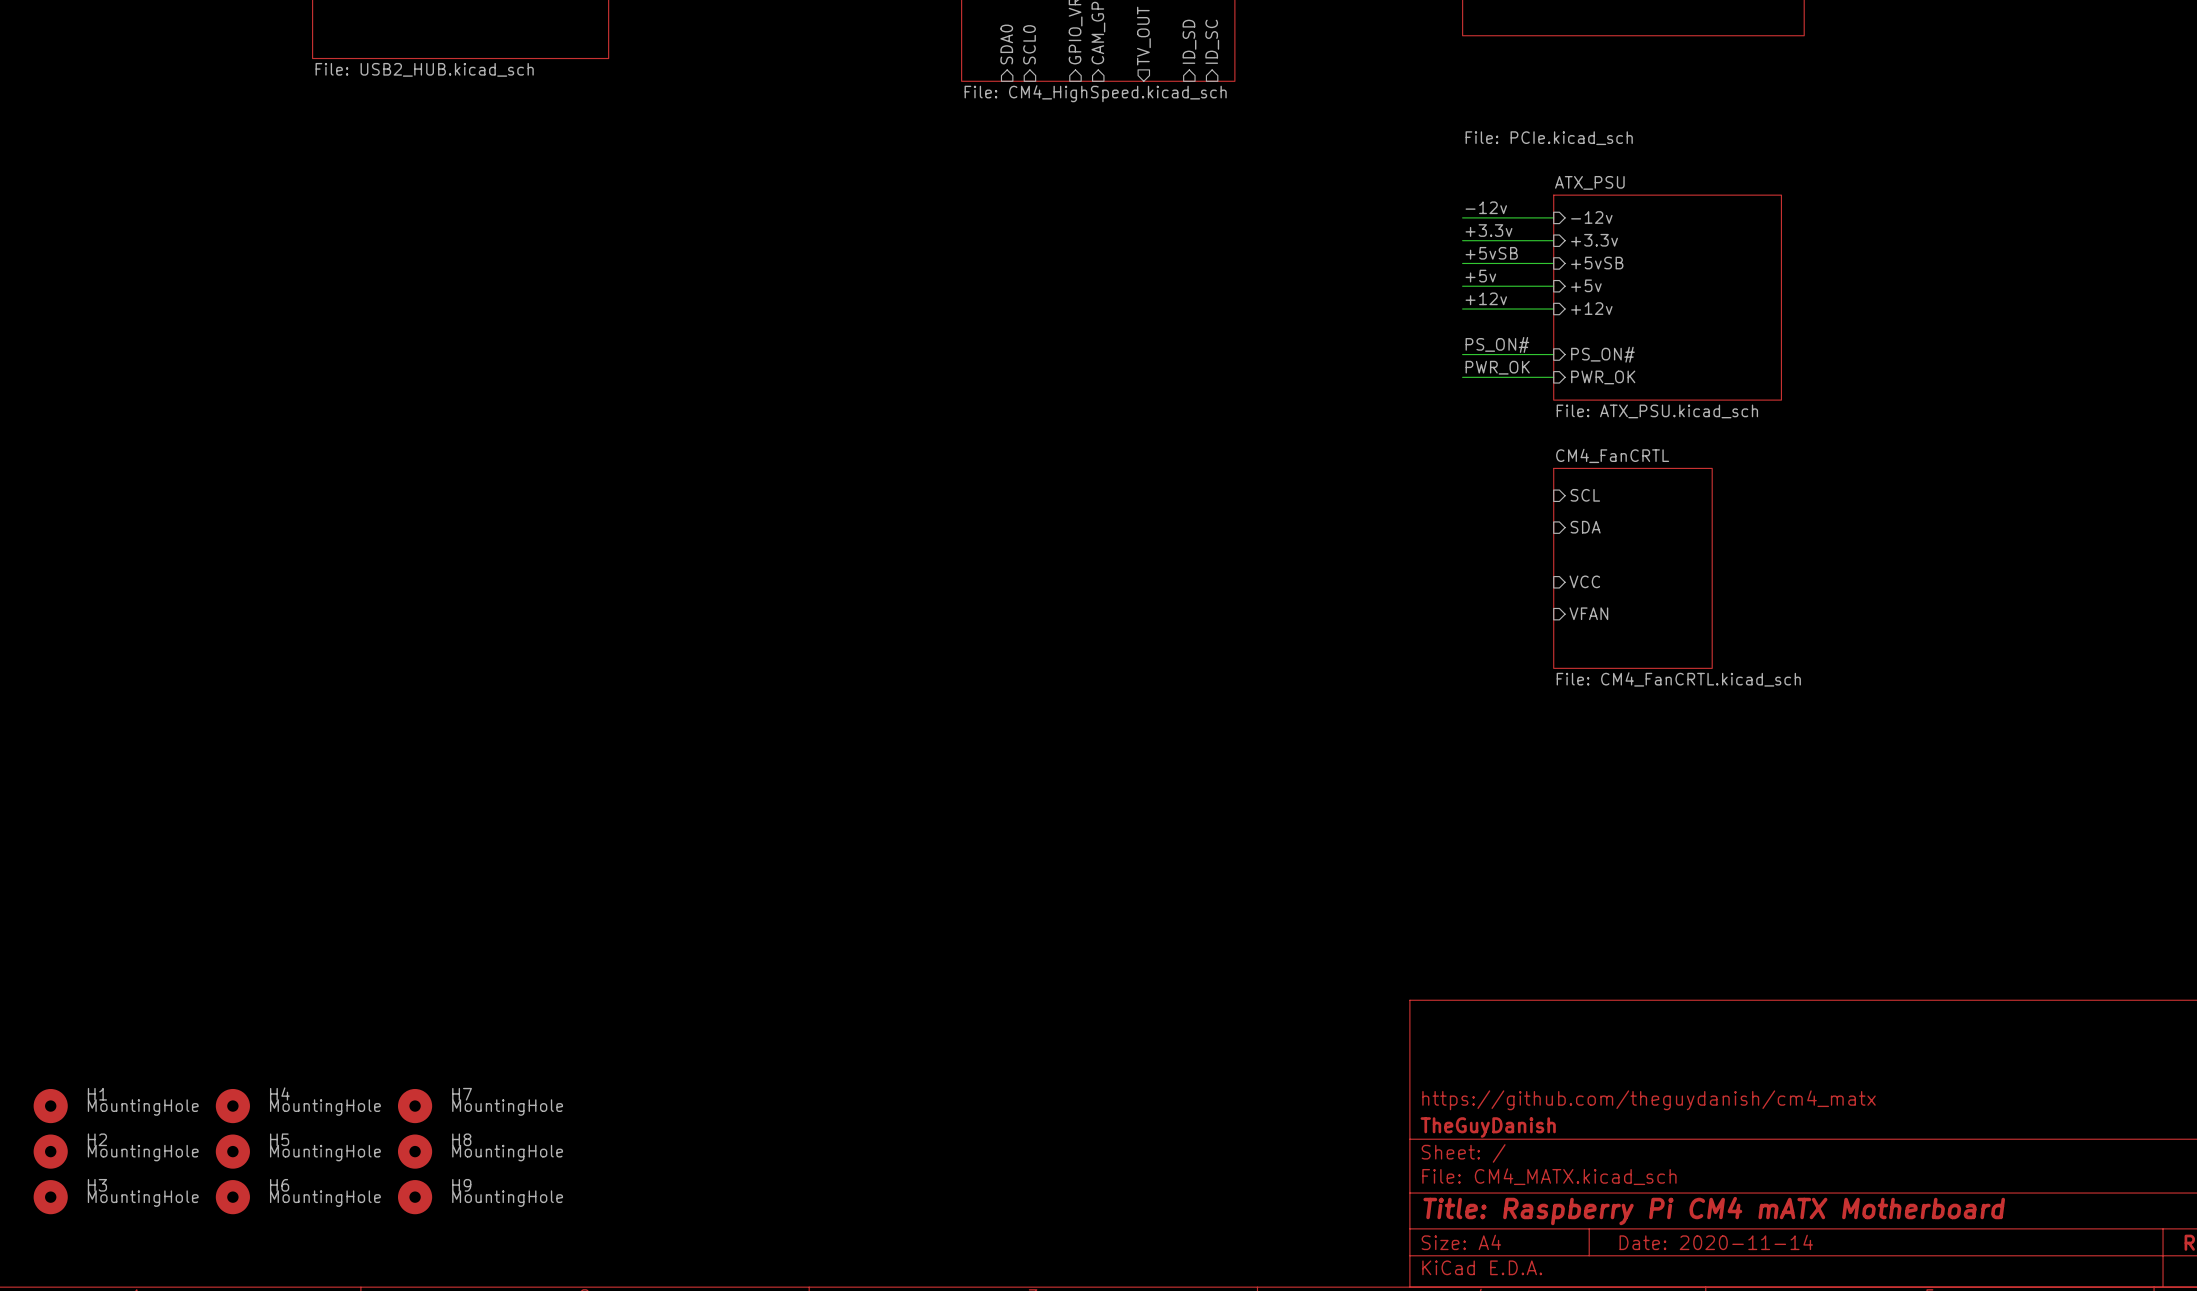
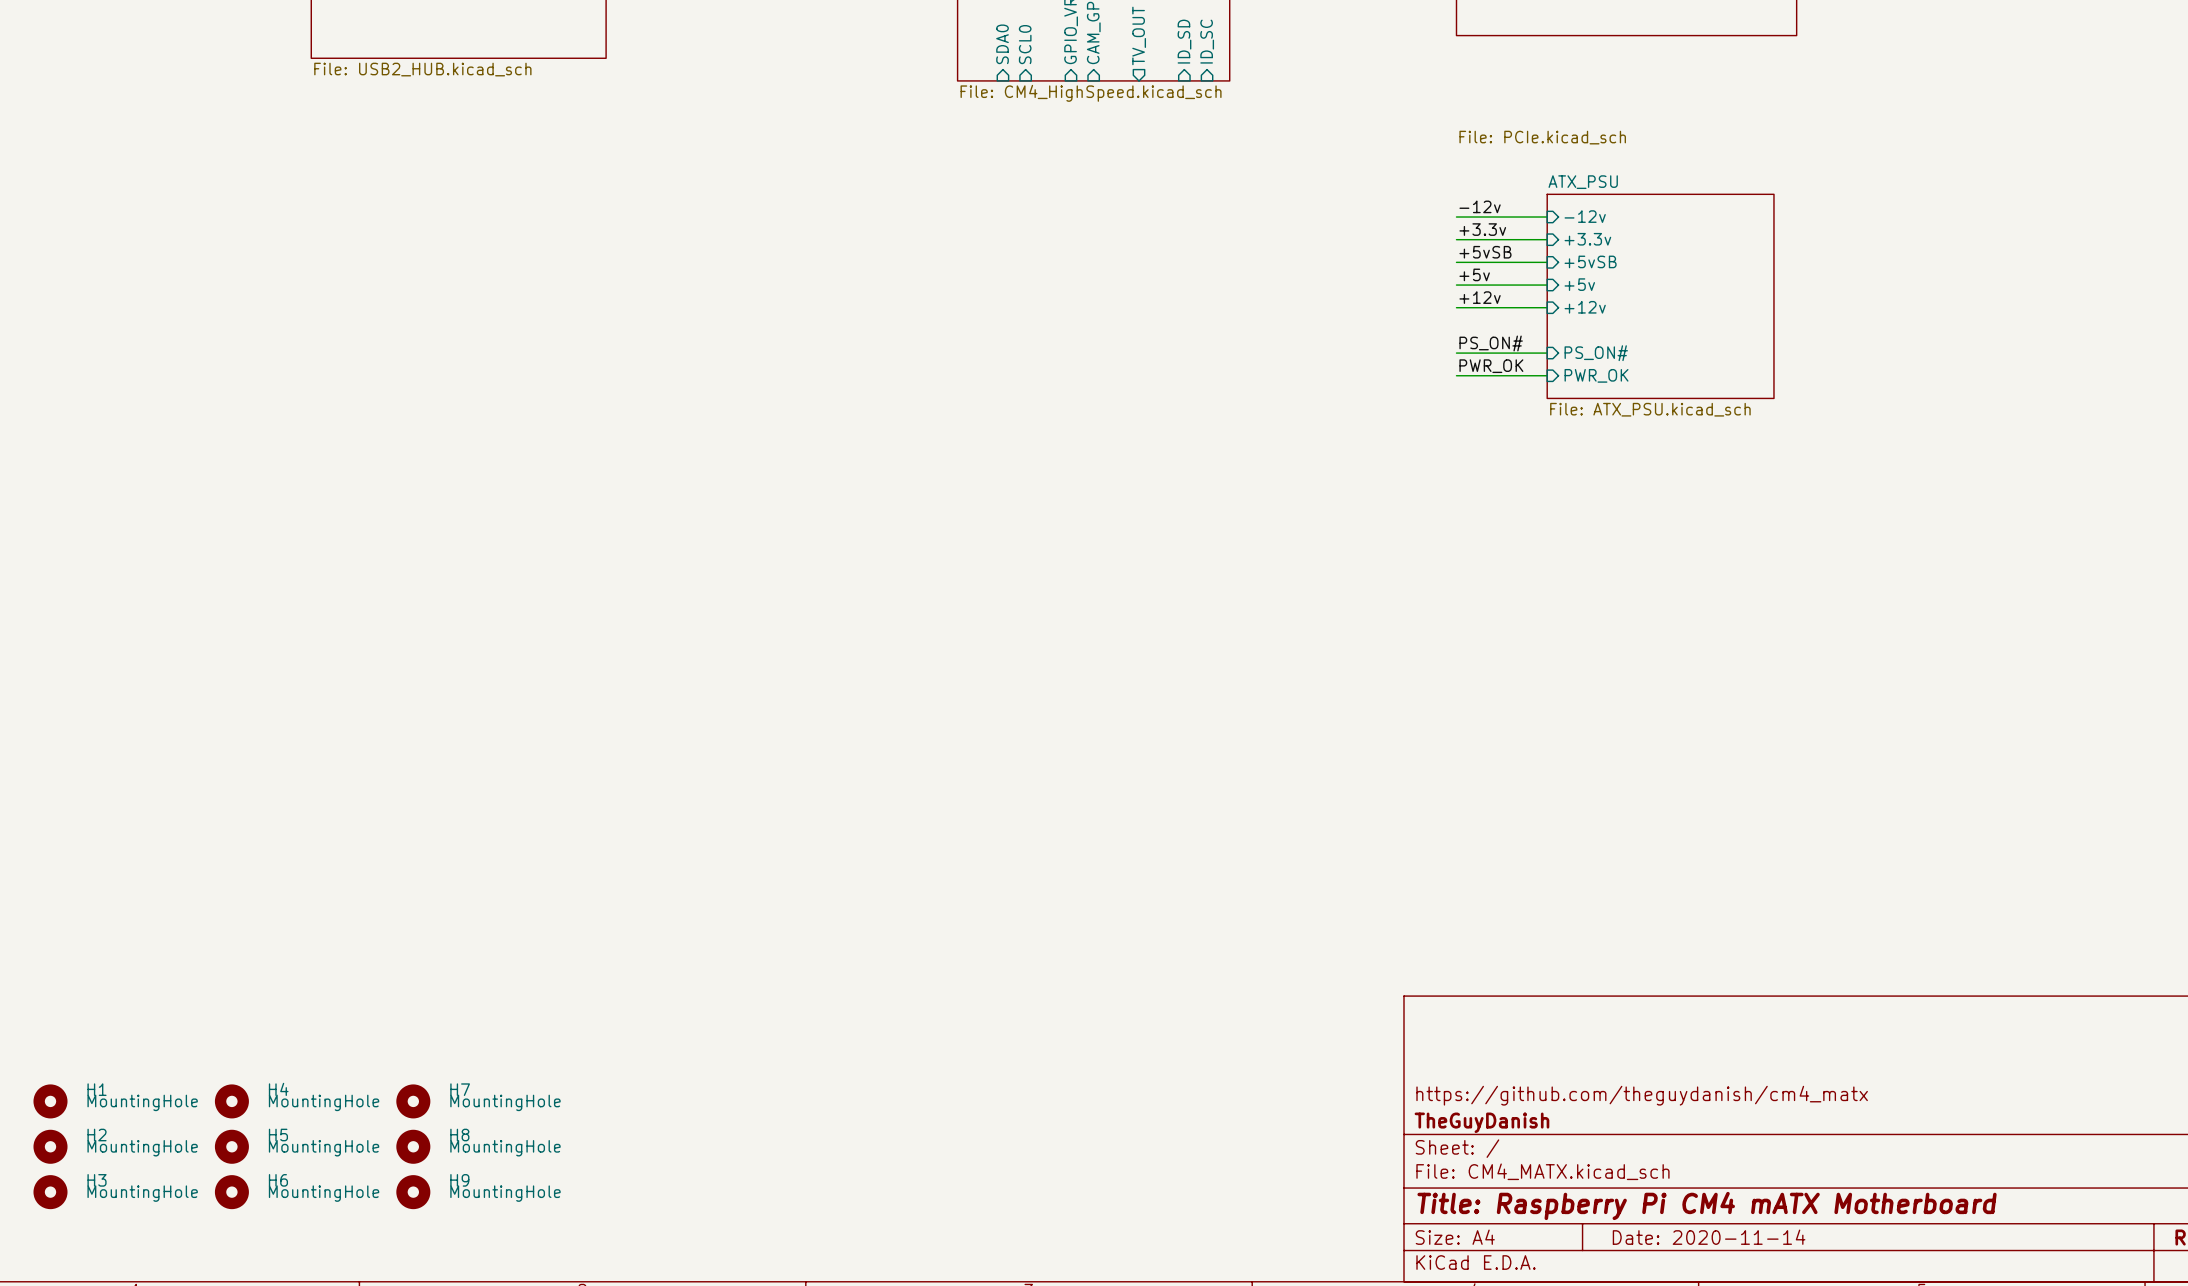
sheet pin: SCL (1585, 495) -> none
sheet pin: SDA (1585, 527) -> none
sheet CM4_FanCRTL: File: CM4_FanCRTL.kicad_sch (1632, 568) -> none
sheet pin: VCC (1584, 581) -> none
sheet pin: VFAN (1588, 613) -> none

